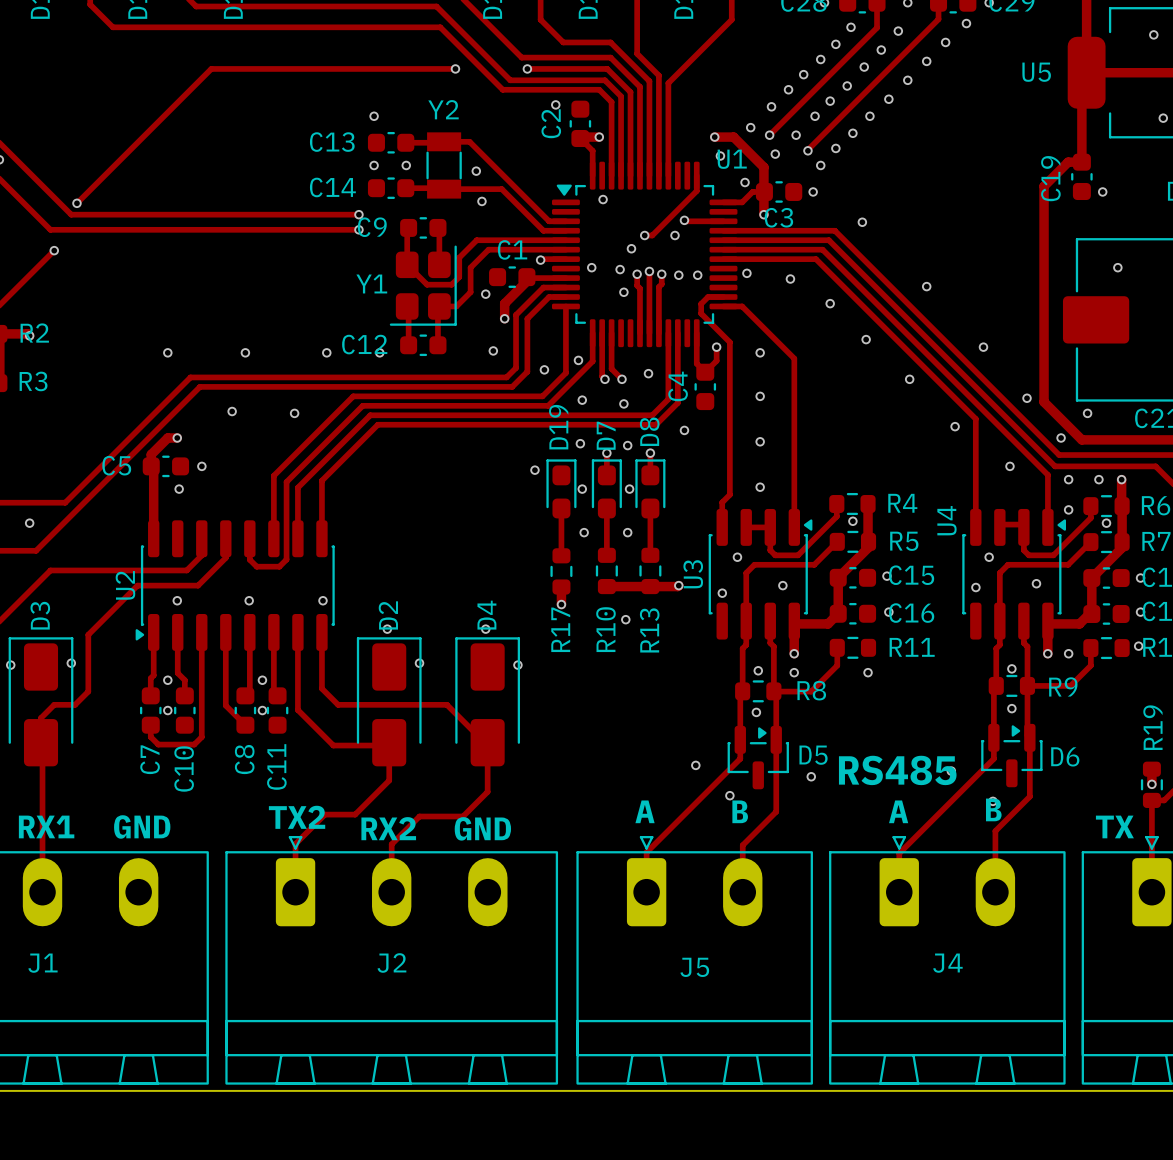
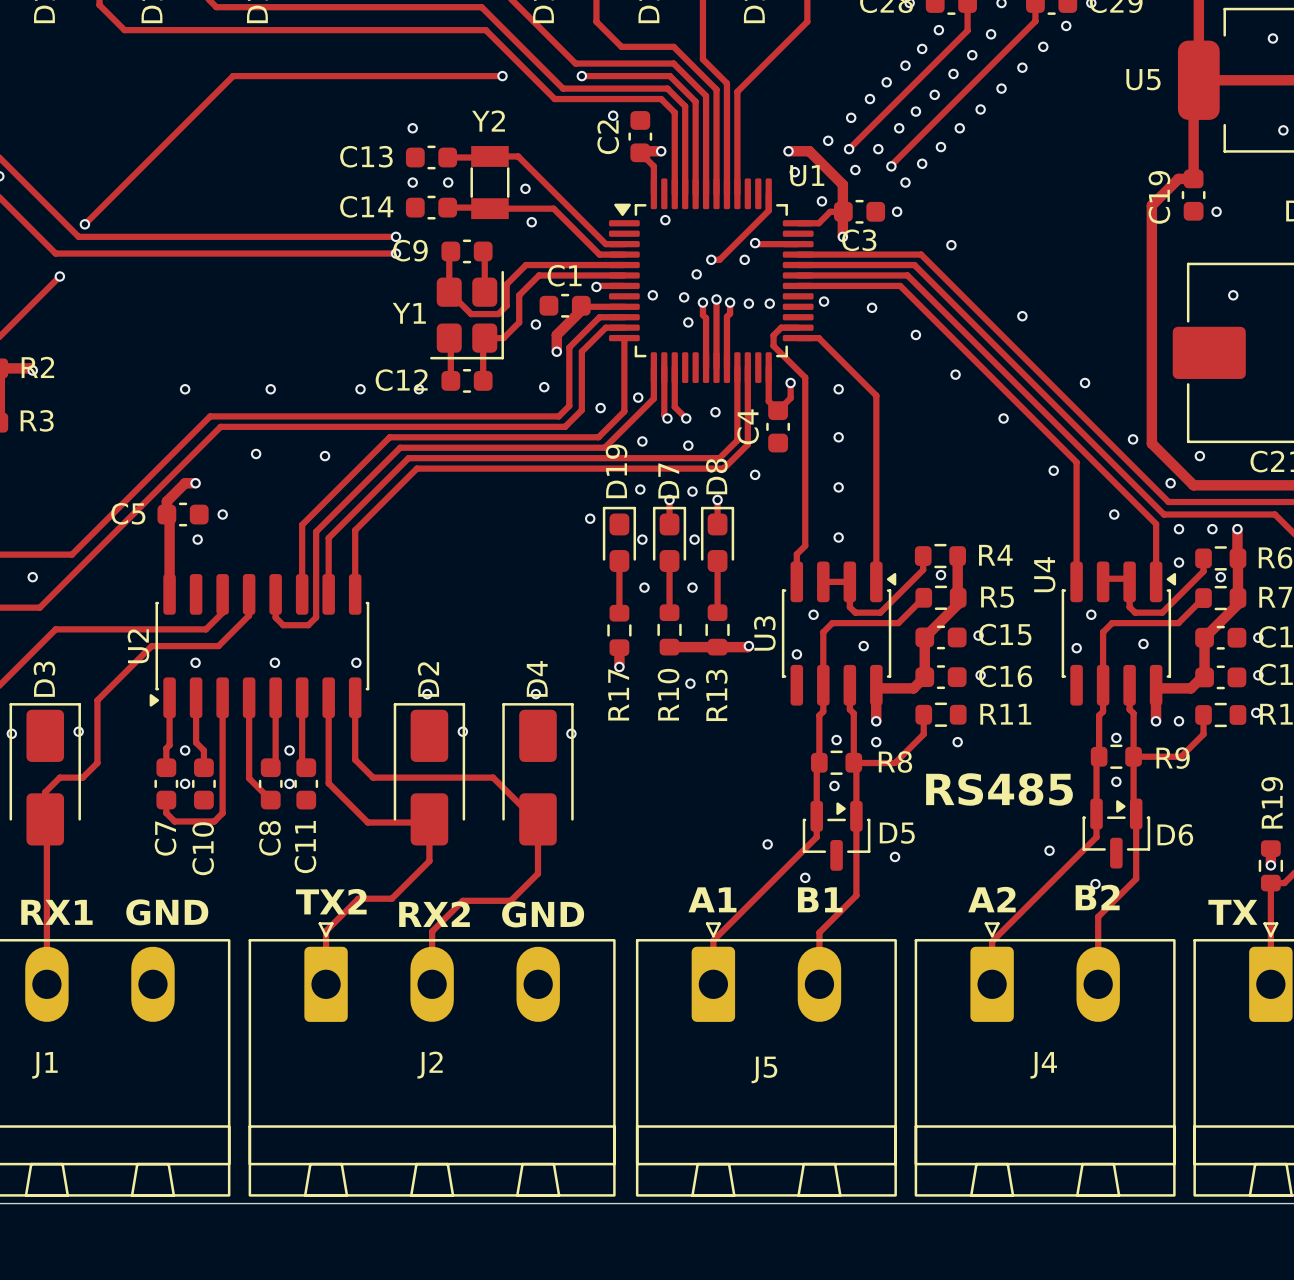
text position: RS485 (897, 770) -> RS485 (999, 789)
text: B (993, 809) -> B2 (1097, 897)
text: A (645, 811) -> A1 (712, 899)
text: B (740, 811) -> B1 (820, 899)
text: A (898, 811) -> A2 (991, 899)

